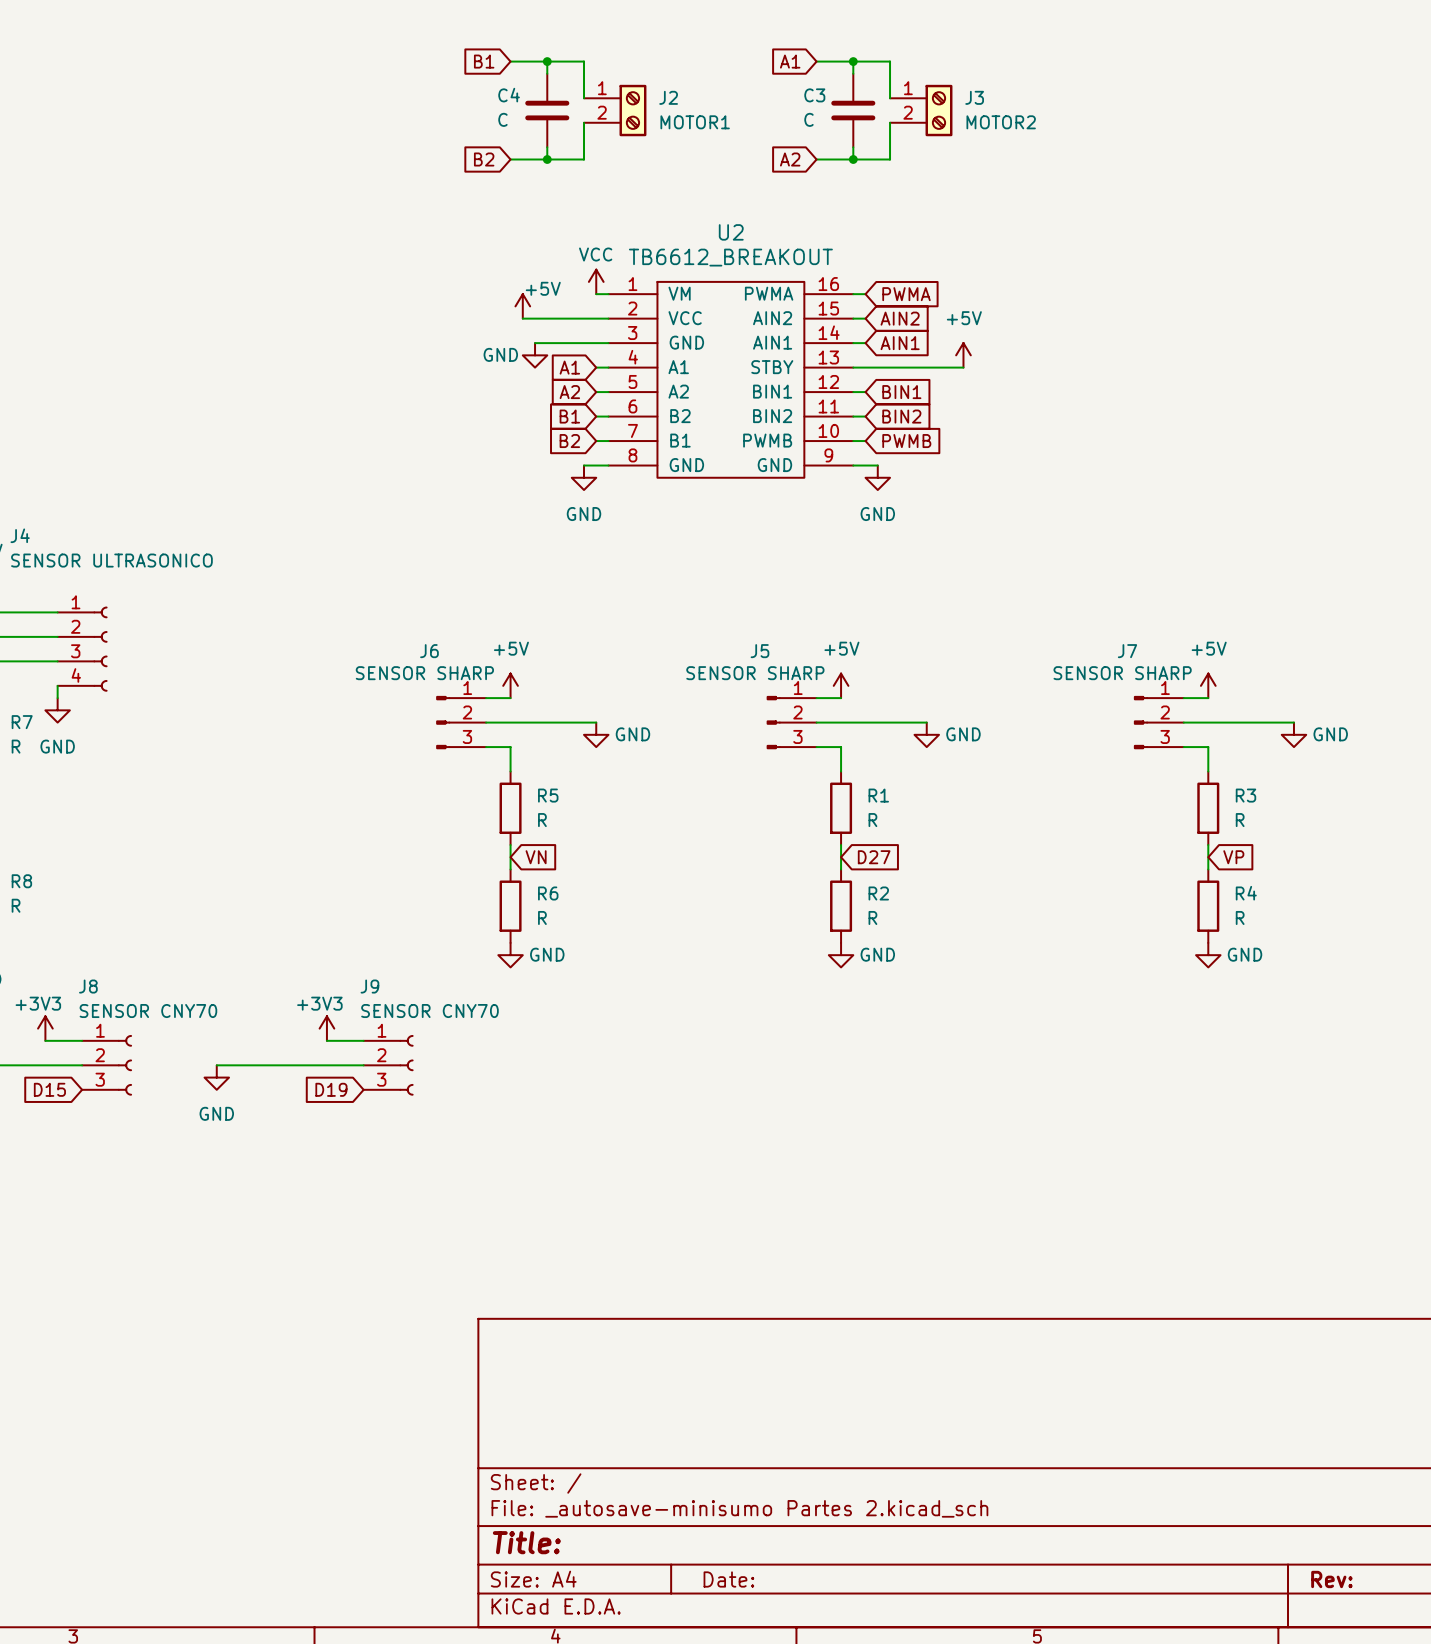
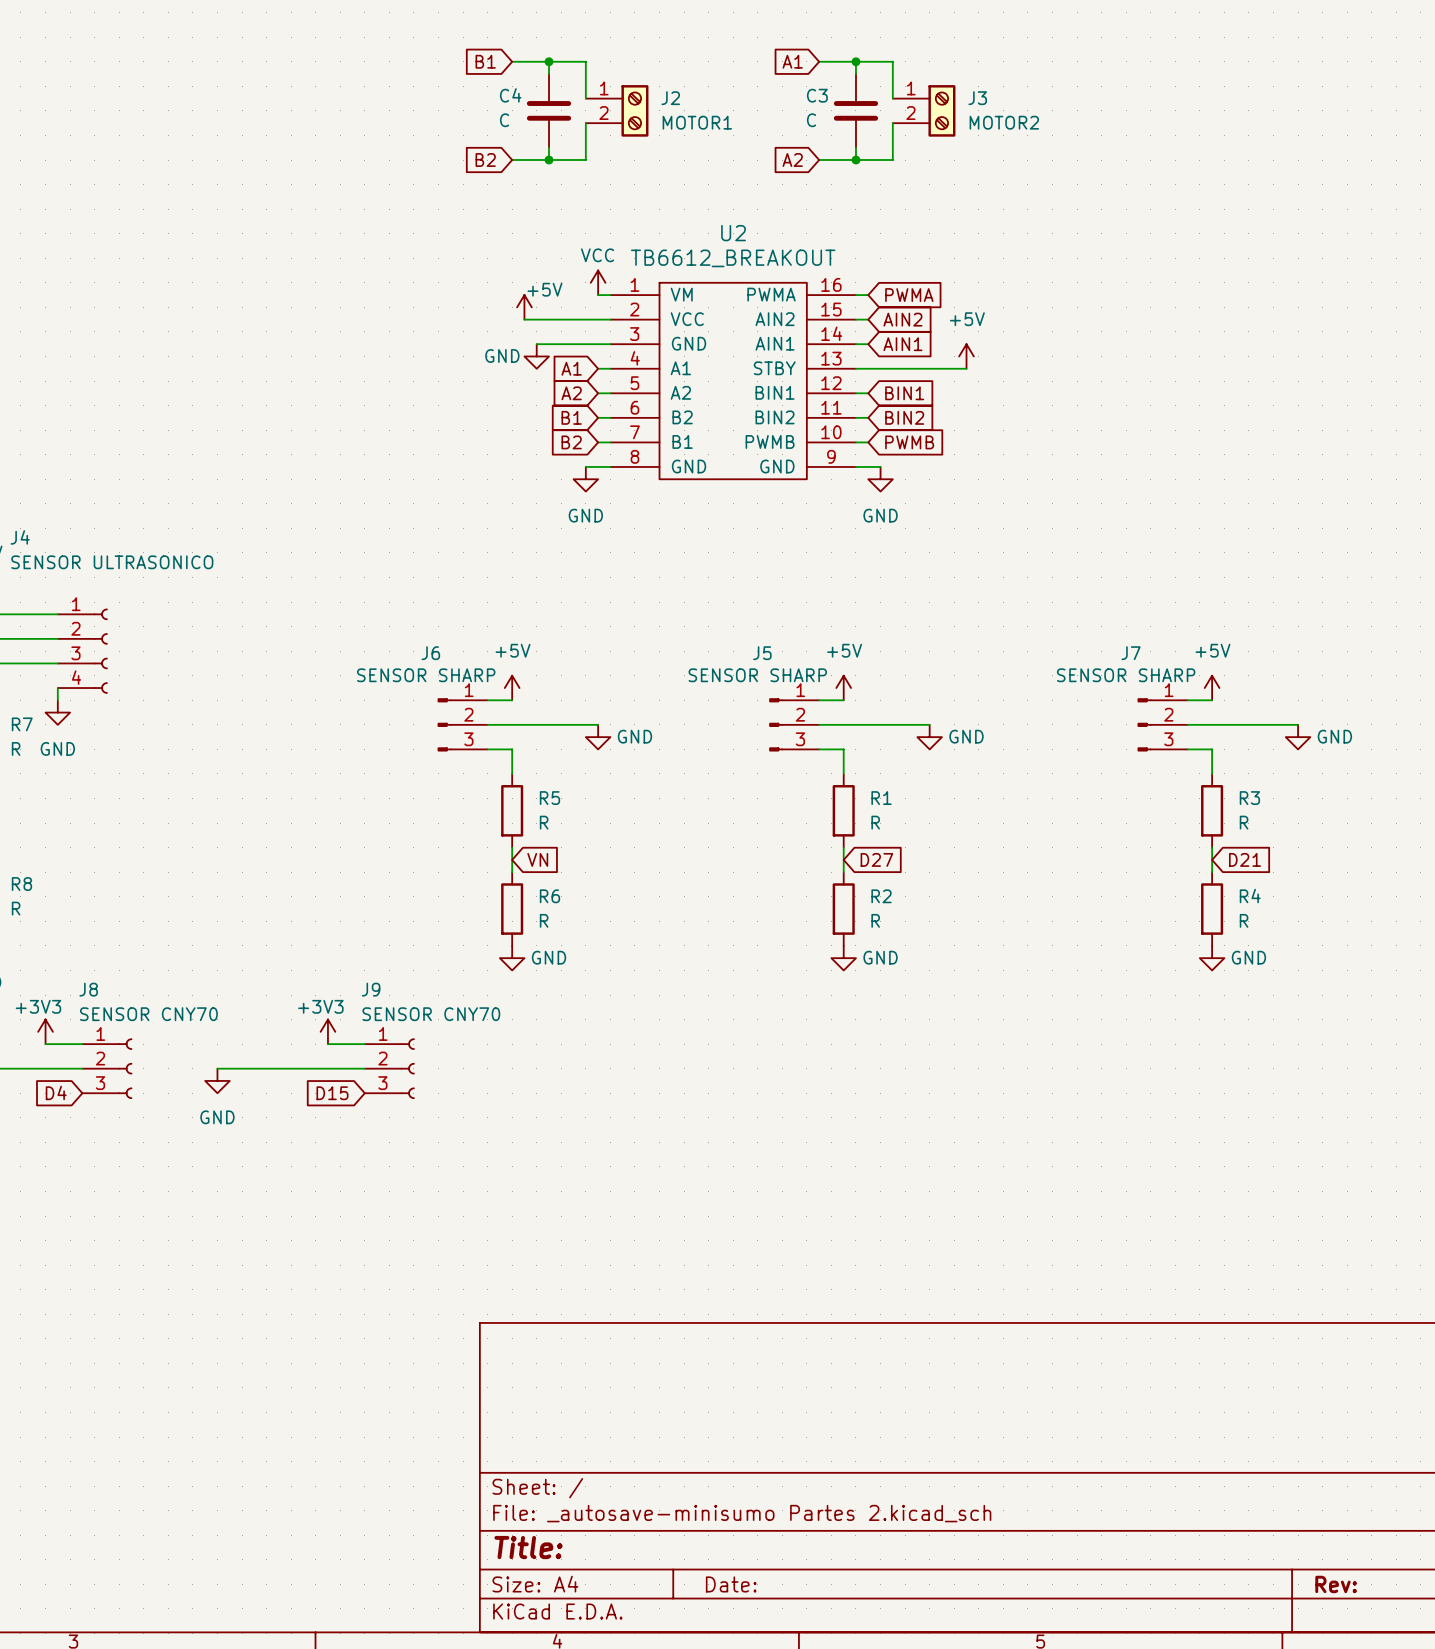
global label: VP (1233, 857) -> D21 (1245, 859)
global label: D15 (49, 1089) -> D4 (56, 1092)
global label: D19 (331, 1089) -> D15 (332, 1093)

